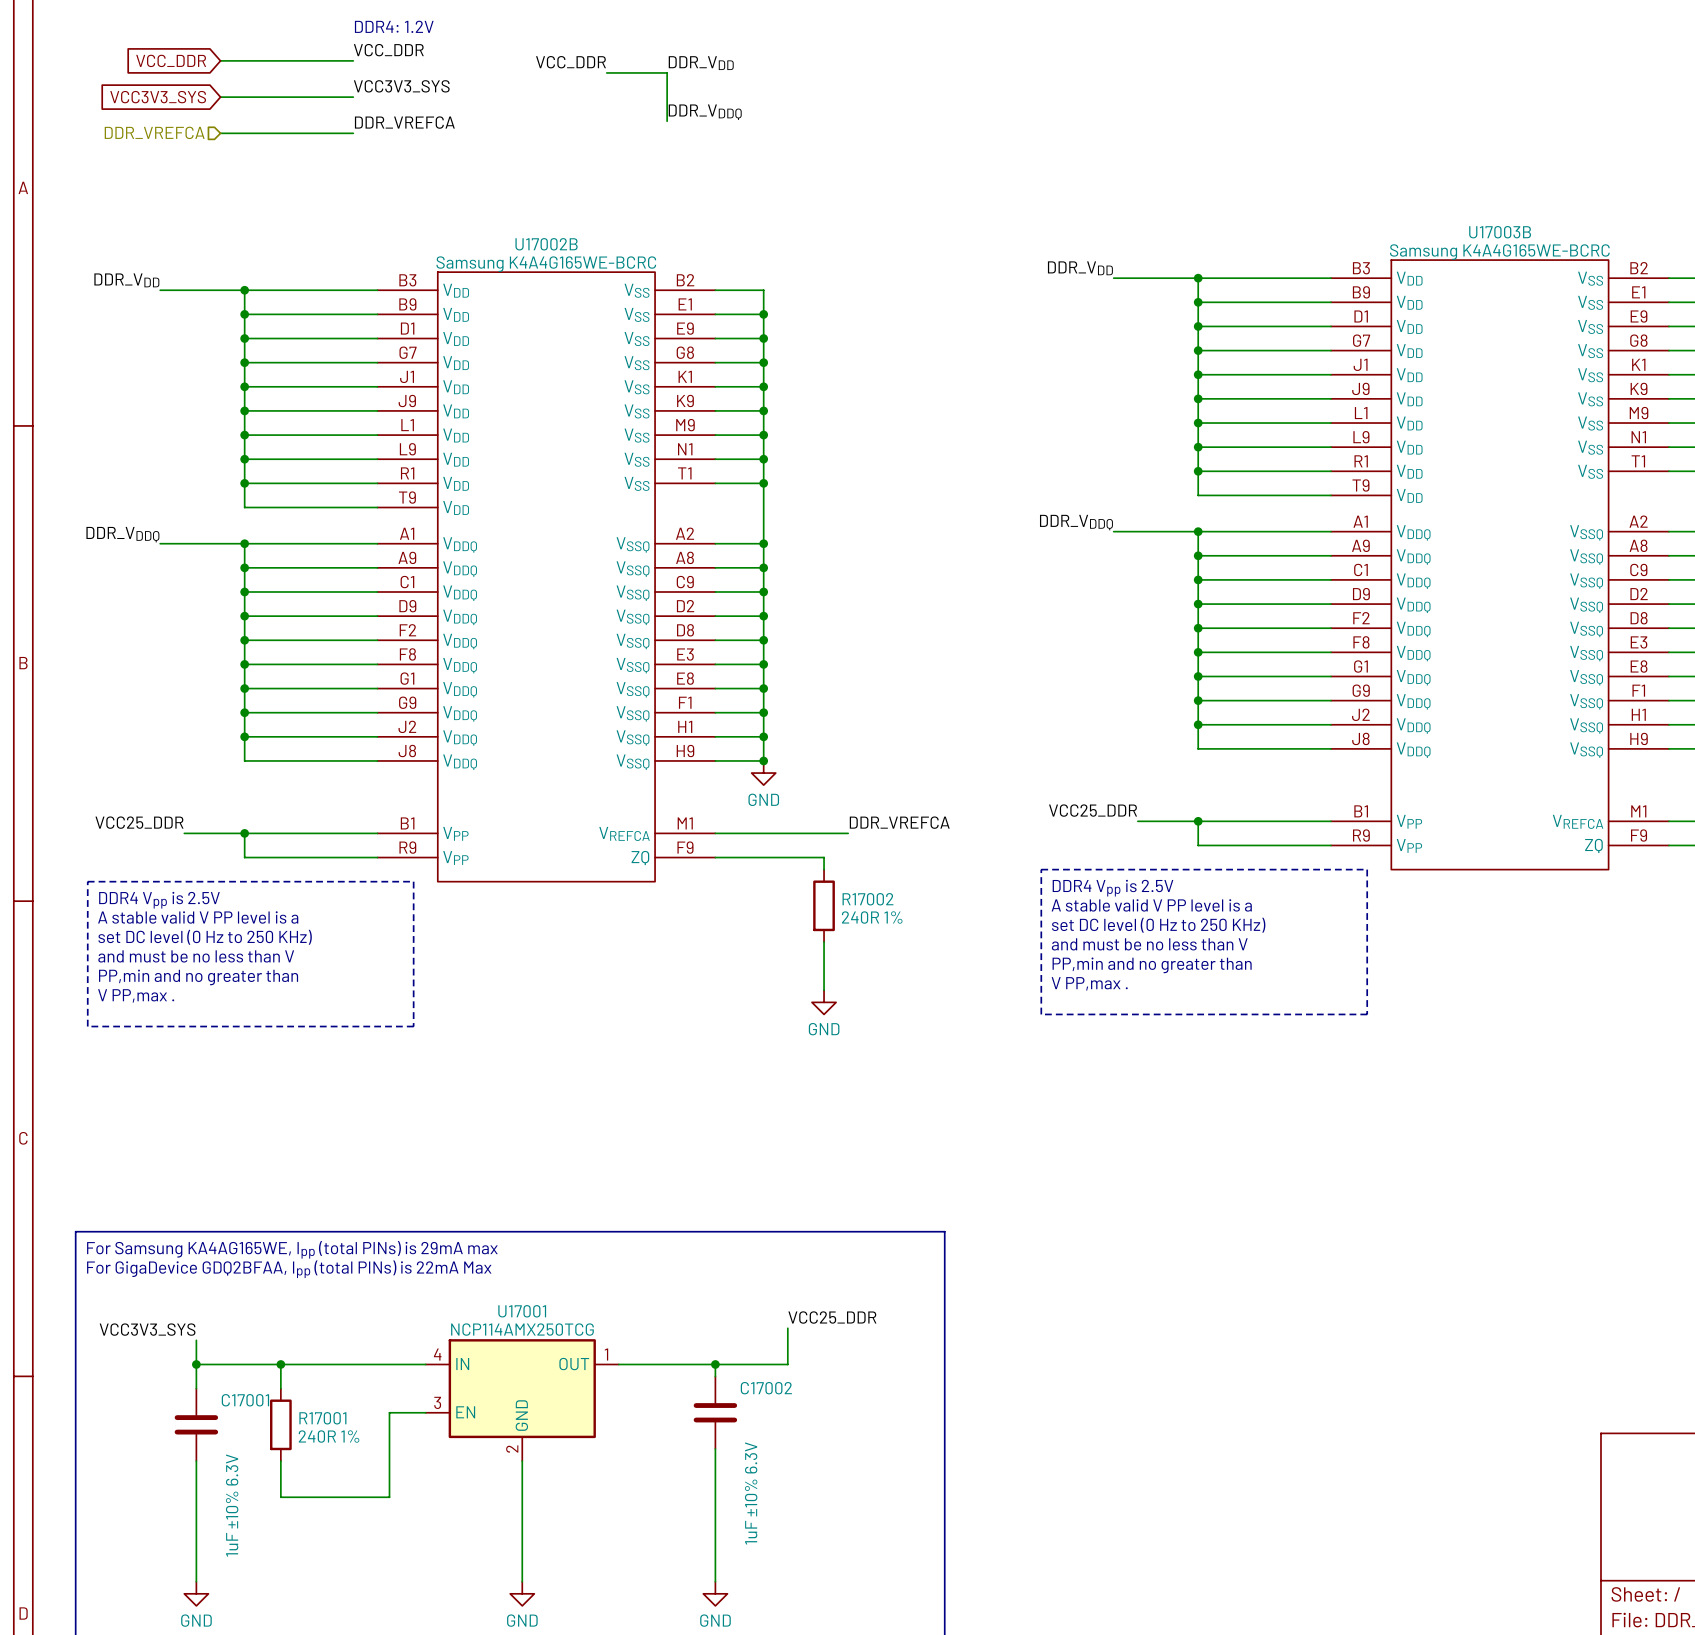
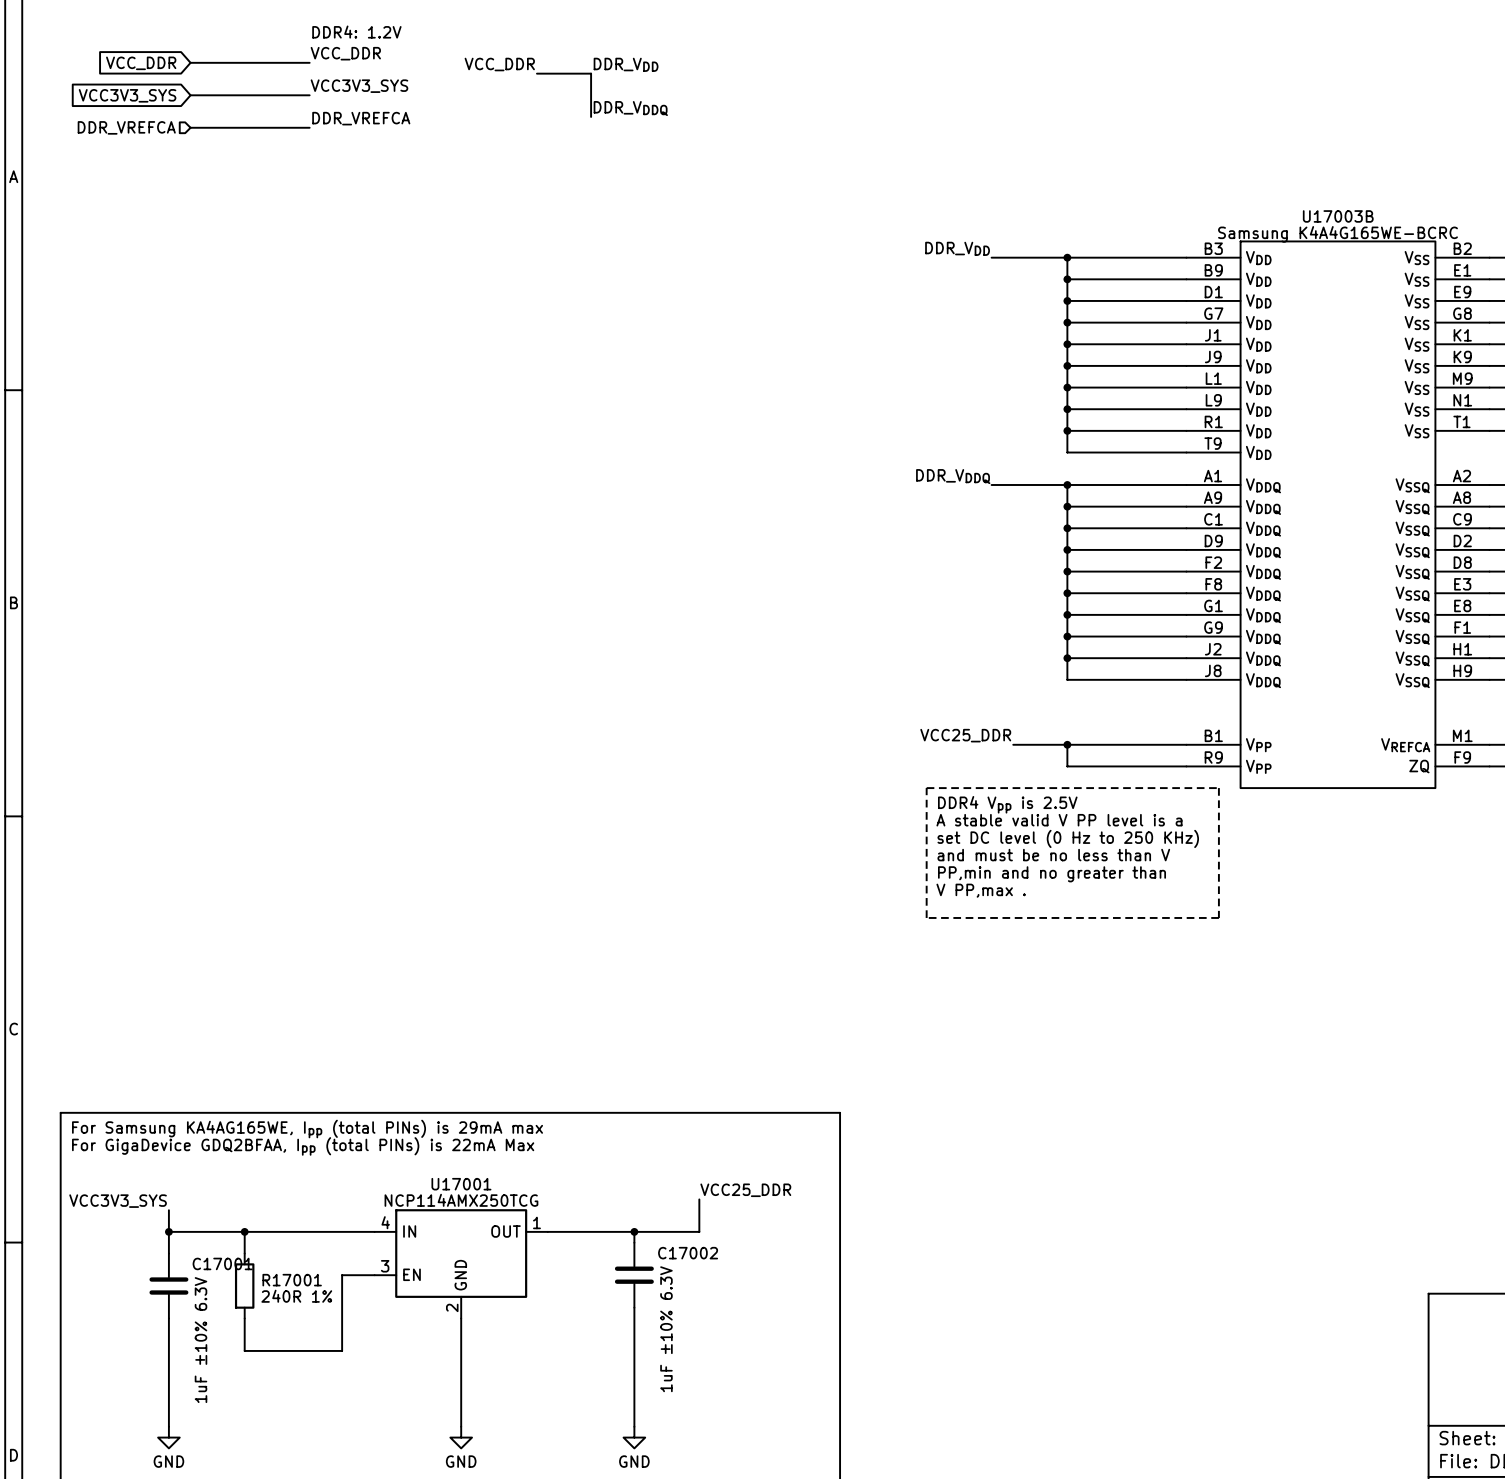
label: DDR_VDD (126, 280) -> none
wire: (160, 290) (377, 290) -> none
wire: (244, 290) (244, 507) (377, 507) -> none
junction: (244, 290) -> none
wire: (715, 290) (763, 290) (763, 760) (715, 760) -> none
wire: (244, 314) (377, 314) -> none
junction: (244, 314) -> none
wire: (715, 314) (763, 314) -> none
junction: (763, 314) -> none
wire: (244, 338) (377, 338) -> none
junction: (244, 338) -> none
wire: (715, 338) (763, 338) -> none
junction: (763, 338) -> none
wire: (244, 362) (377, 362) -> none
junction: (244, 362) -> none
wire: (715, 362) (763, 362) -> none
junction: (763, 362) -> none
wire: (244, 386) (377, 386) -> none
junction: (244, 386) -> none
wire: (715, 386) (763, 386) -> none
junction: (763, 386) -> none
wire: (244, 410) (377, 410) -> none
junction: (244, 410) -> none
wire: (715, 410) (763, 410) -> none
junction: (763, 410) -> none
wire: (244, 435) (377, 435) -> none
junction: (244, 435) -> none
wire: (715, 435) (763, 435) -> none
junction: (763, 435) -> none
wire: (244, 459) (377, 459) -> none
junction: (244, 459) -> none
wire: (715, 459) (763, 459) -> none
junction: (763, 459) -> none
wire: (244, 483) (377, 483) -> none
junction: (244, 483) -> none
wire: (715, 483) (763, 483) -> none
junction: (763, 483) -> none
label: DDR_VDDQ (122, 534) -> none
wire: (160, 543) (377, 543) -> none
wire: (244, 543) (244, 760) (377, 760) -> none
junction: (244, 543) -> none
wire: (715, 543) (763, 543) -> none
junction: (763, 543) -> none
wire: (244, 567) (377, 567) -> none
junction: (244, 567) -> none
wire: (715, 567) (763, 567) -> none
junction: (763, 567) -> none
U17002B: Samsung K4A4G165WE-BCRC (546, 576) -> none
wire: (244, 591) (377, 591) -> none
junction: (244, 591) -> none
wire: (715, 591) (763, 591) -> none
junction: (763, 591) -> none
wire: (244, 616) (377, 616) -> none
junction: (244, 616) -> none
wire: (715, 616) (763, 616) -> none
junction: (763, 616) -> none
wire: (244, 640) (377, 640) -> none
junction: (244, 640) -> none
wire: (715, 640) (763, 640) -> none
junction: (763, 640) -> none
wire: (244, 664) (377, 664) -> none
junction: (244, 664) -> none
wire: (715, 664) (763, 664) -> none
junction: (763, 664) -> none
wire: (244, 688) (377, 688) -> none
junction: (244, 688) -> none
wire: (715, 688) (763, 688) -> none
junction: (763, 688) -> none
wire: (244, 712) (377, 712) -> none
junction: (244, 712) -> none
wire: (715, 712) (763, 712) -> none
junction: (763, 712) -> none
wire: (244, 736) (377, 736) -> none
junction: (244, 736) -> none
wire: (715, 736) (763, 736) -> none
junction: (763, 736) -> none
junction: (763, 760) -> none
power symbol: GND (763, 773) -> none
label: VCC25_DDR (139, 822) -> none
label: DDR_VREFCA (899, 822) -> none
wire: (184, 833) (377, 833) -> none
wire: (244, 833) (244, 857) (377, 857) -> none
junction: (244, 833) -> none
wire: (715, 833) (848, 833) -> none
wire: (715, 857) (824, 857) (824, 869) -> none
line: (87, 881) (413, 881) (413, 1026) (87, 1026) (87, 881) -> none
text: DDR4 Vpp is 2.5V (159, 900) -> none
R17002: 240R 1% (824, 905) -> none
text: A stable valid V PP level is a (198, 917) -> none
text: set DC level (0 Hz to 250 KHz) (205, 937) -> none
wire: (824, 942) (824, 990) -> none
text: and must be no less than V (196, 956) -> none
text: PP,min and no greater than (198, 977) -> none
text: V PP,max . (136, 995) -> none
power symbol: GND (824, 1002) -> none

